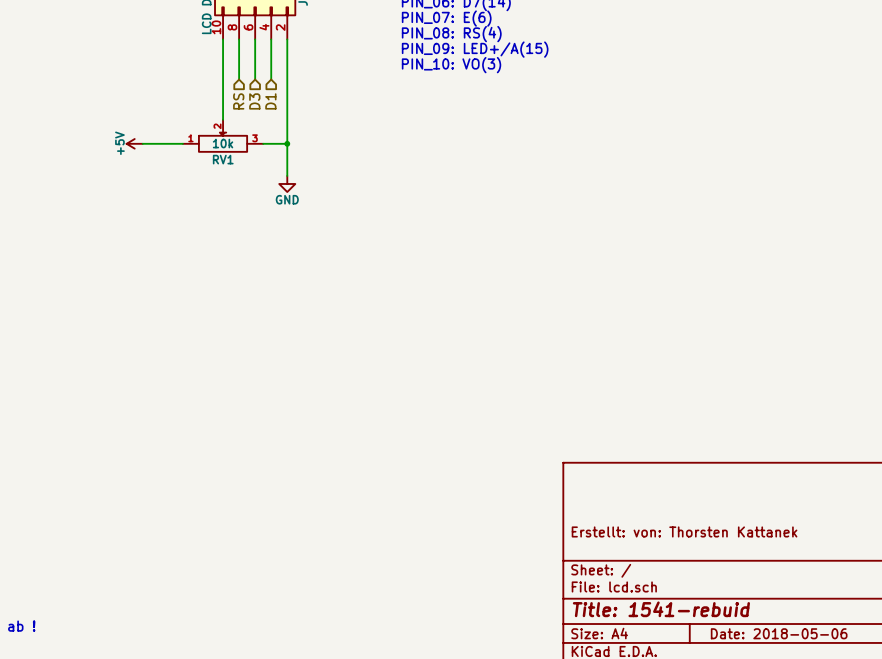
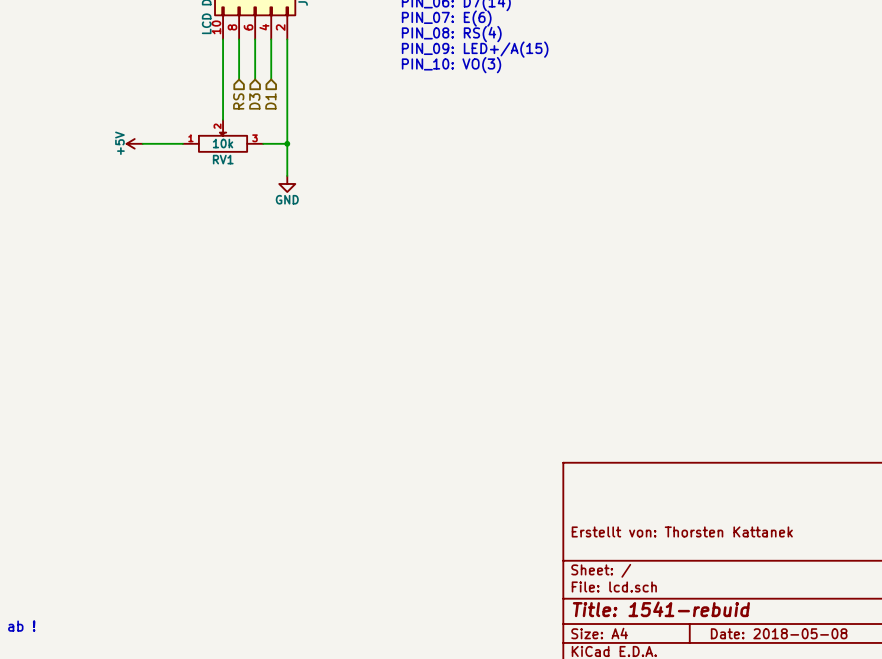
title block: Erstellt: von: Thorsten Kattanek (684, 531) -> Erstellt von: Thorsten Kattanek (682, 531)
title block: Date: 2018-05-06 (779, 633) -> Date: 2018-05-08 (779, 633)

